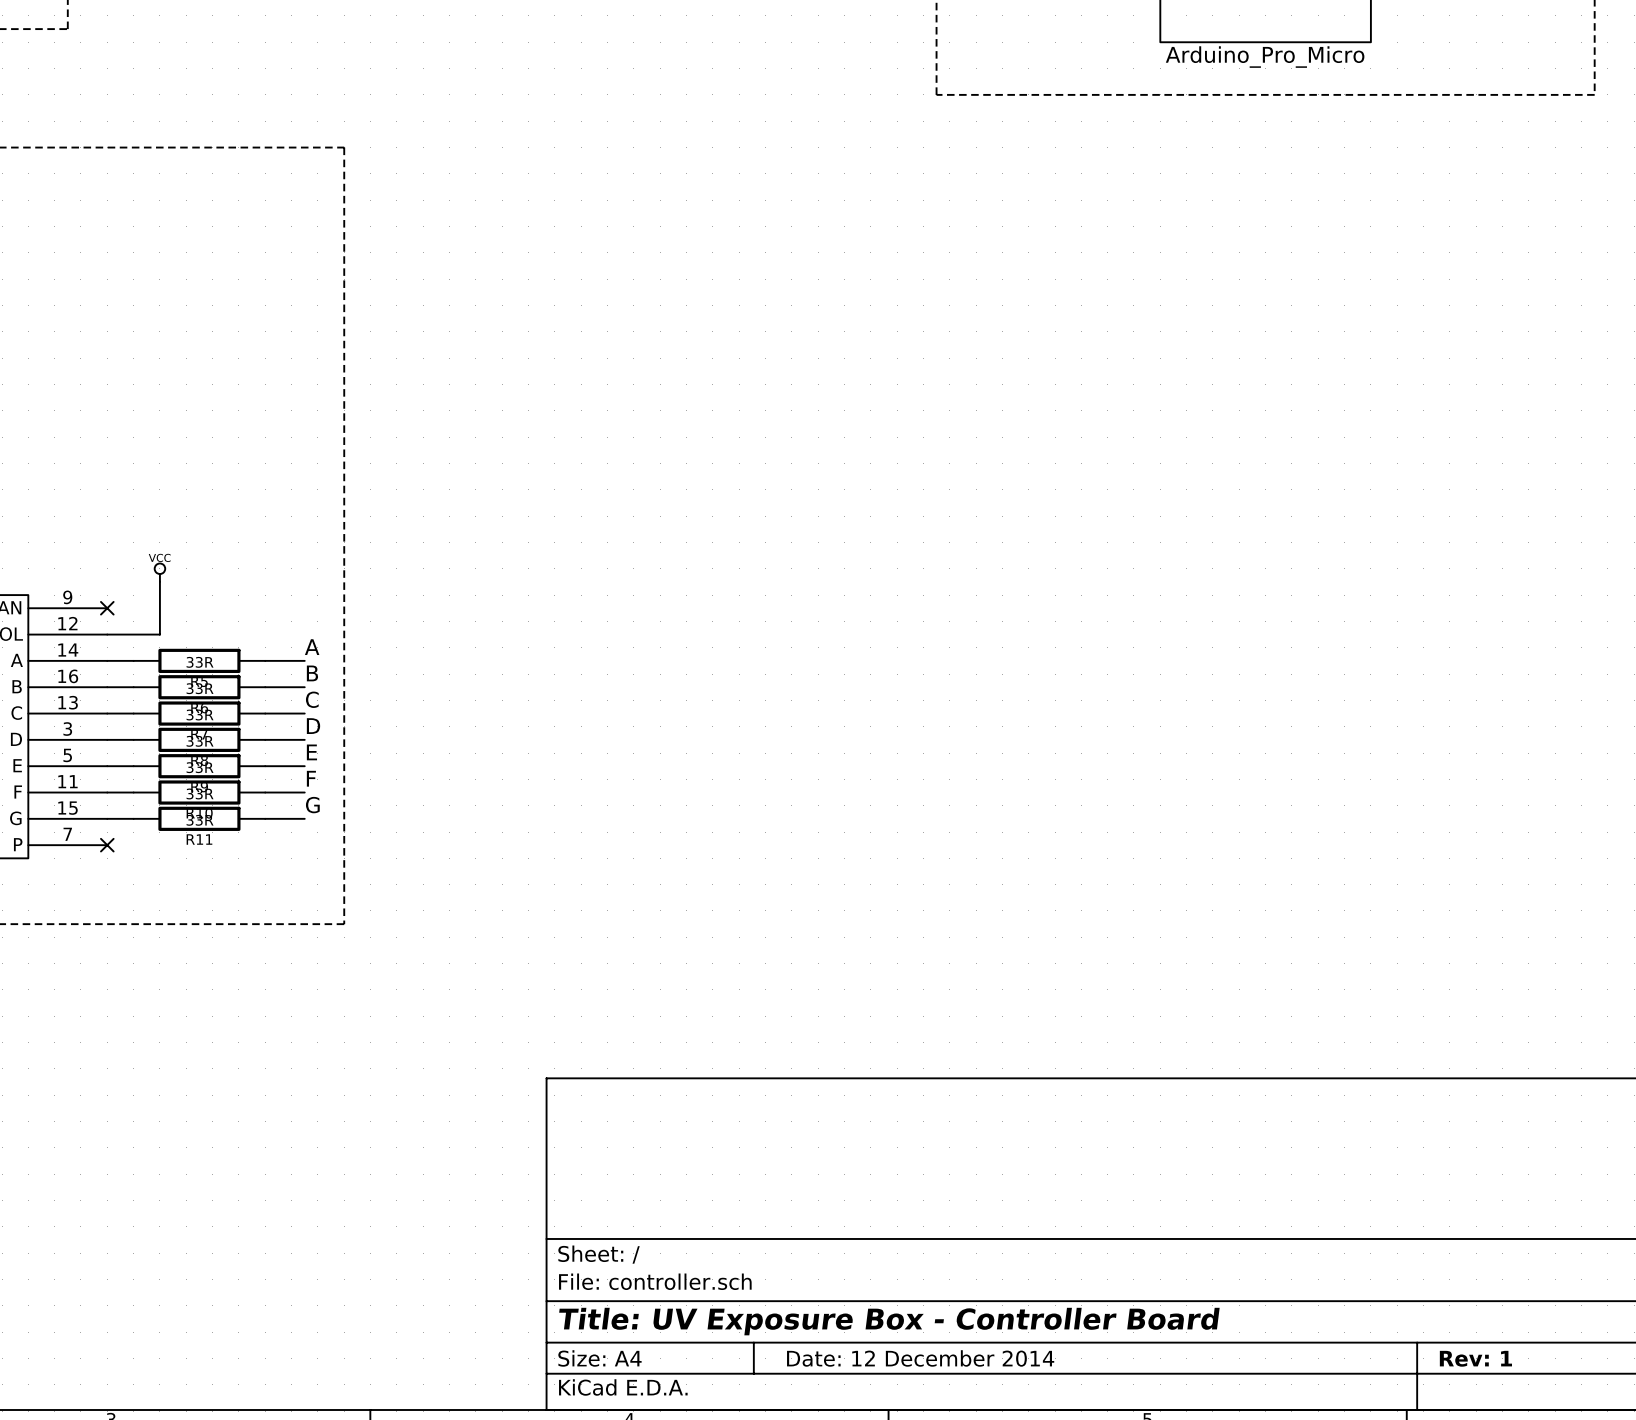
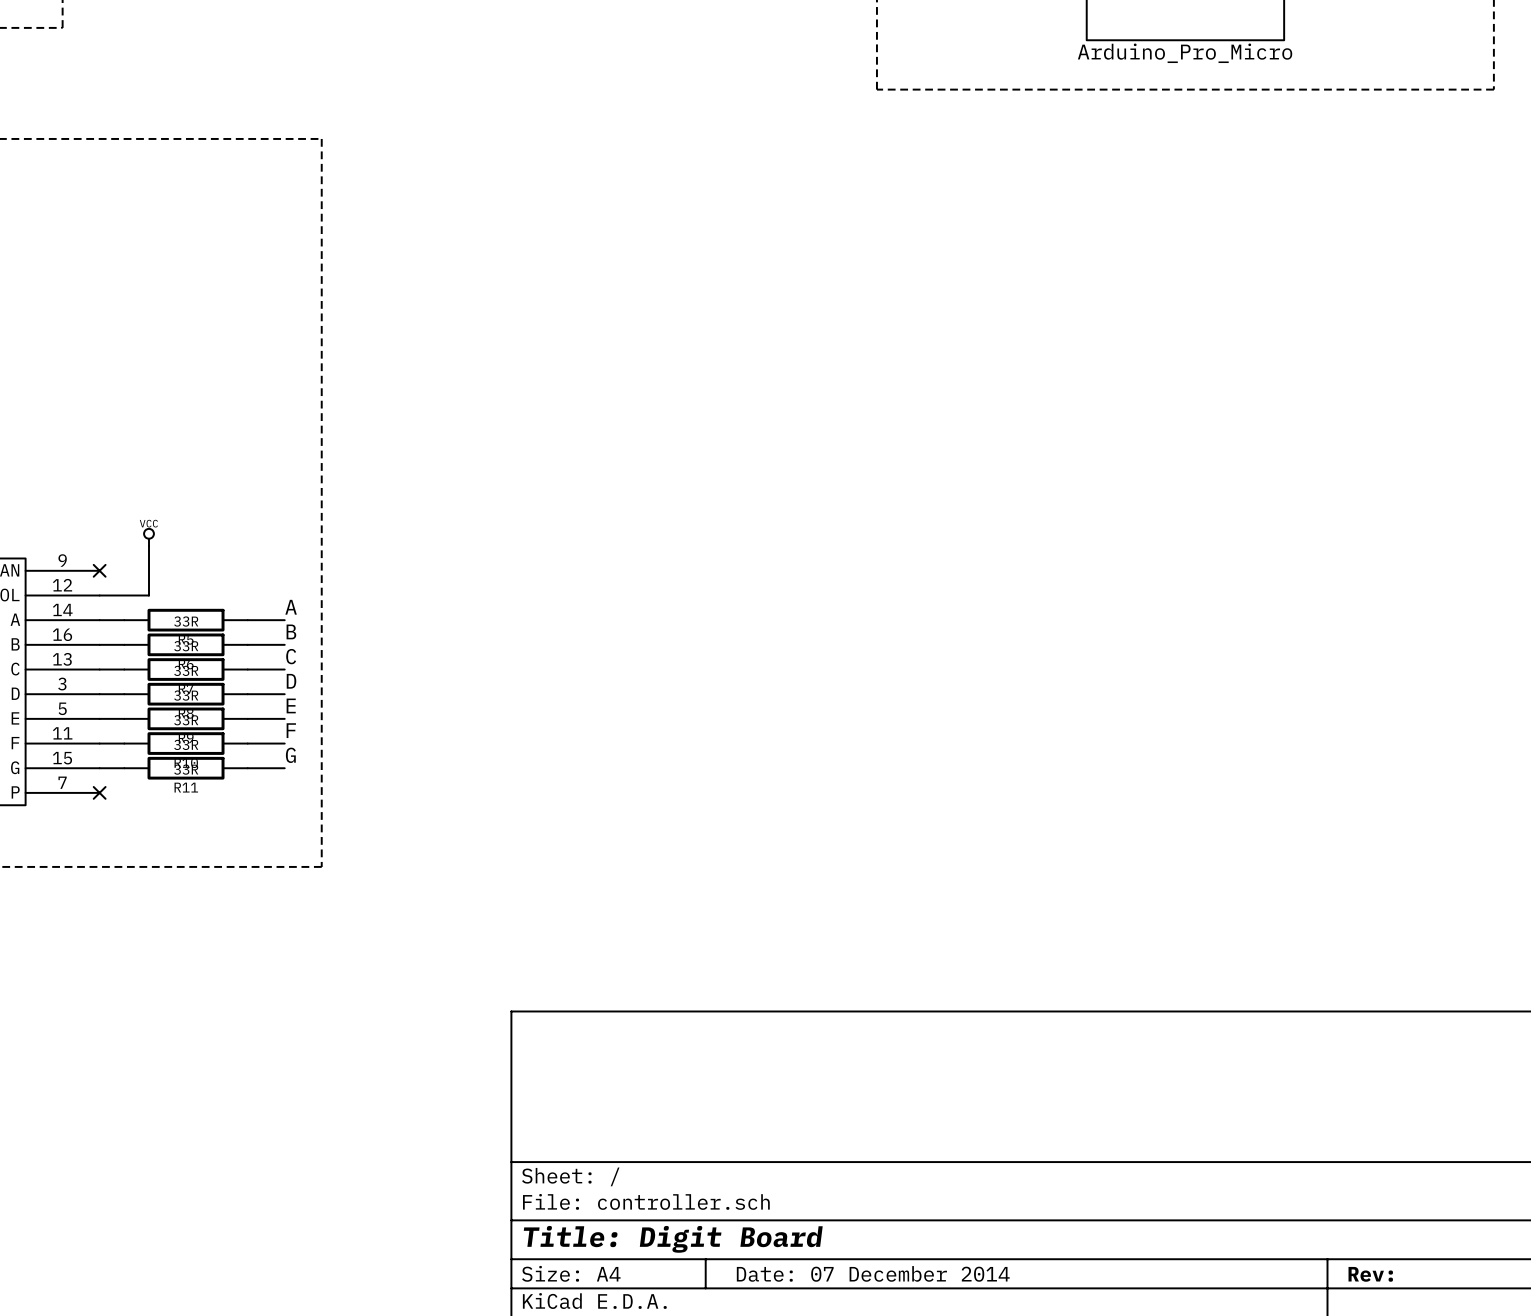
title block: Title: UV Exposure Box - Controller Board (889, 1321) -> Title: Digit Board (673, 1239)
title block: Date: 12 December 2014 (920, 1358) -> Date: 07 December 2014 (873, 1273)
title block: Rev: 1 (1475, 1358) -> Rev: (1370, 1274)

